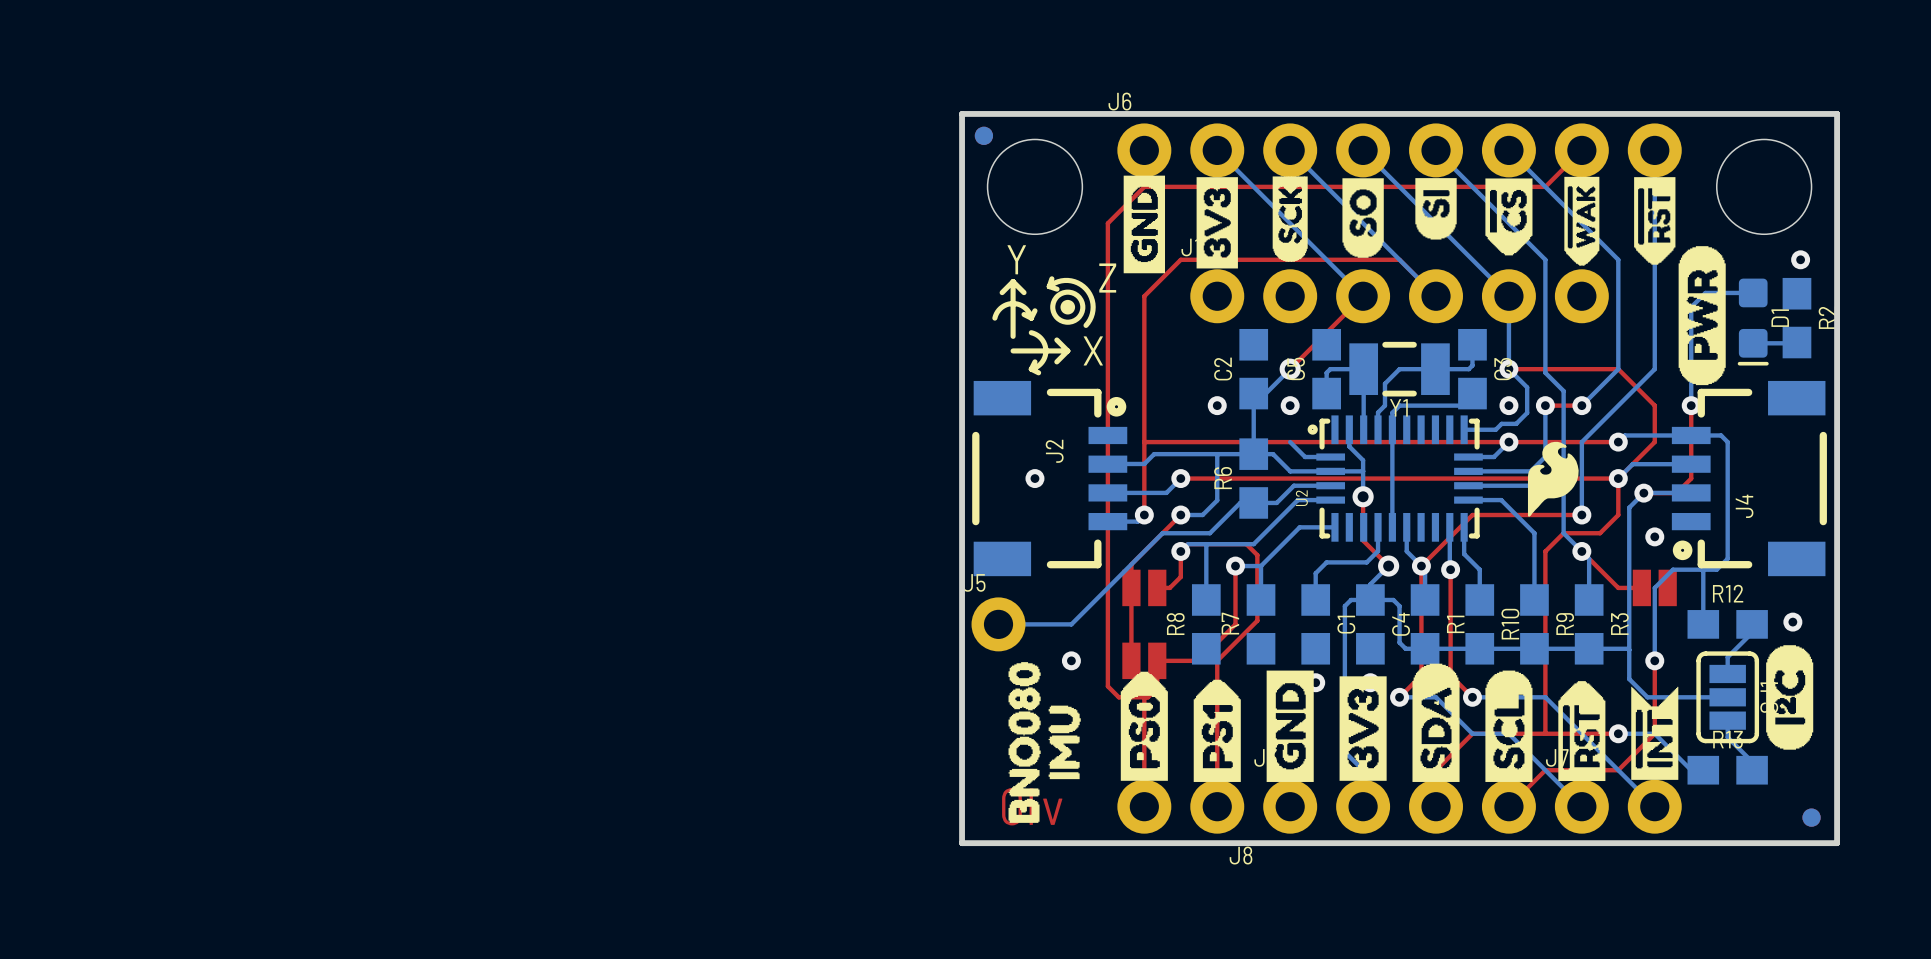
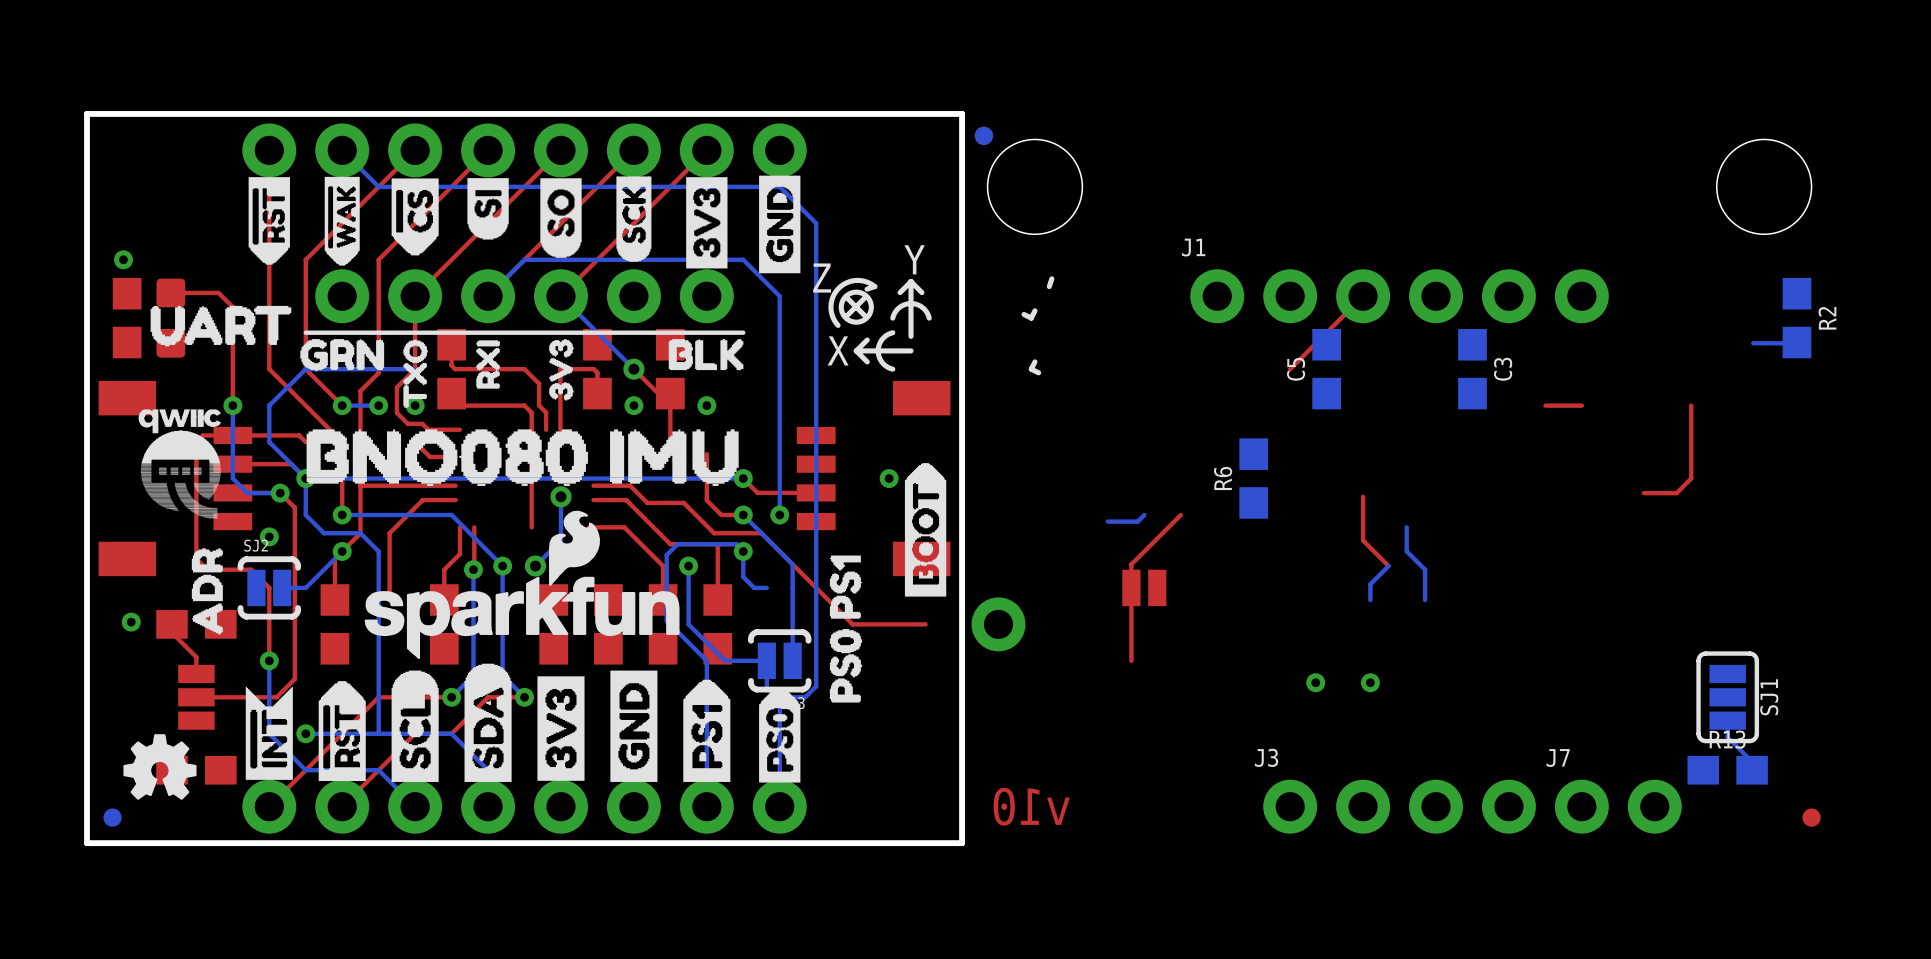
board edge: (962, 113) (1837, 113) (1837, 843) (962, 843) -> (962, 113) (87, 113) (87, 843) (962, 843)
top track: none -> (269, 150) (269, 369) (342, 442) (342, 515)
bottom track: none -> (342, 150) (378, 186) (779, 186) (816, 223) (816, 686) (805, 697) (776, 697) (766, 688) (766, 660) (725, 660) (688, 624) (688, 566)
top track: none -> (415, 150) (305, 259) (305, 369) (342, 405)
top track: none -> (488, 150) (378, 259) (378, 372) (360, 391) (360, 533) (334, 558) (334, 599)
part: none -> (524, 150)
top track: none -> (560, 150) (415, 296) (415, 369) (396, 387) (396, 412) (407, 423) (422, 423) (428, 429) (459, 429)
top track: none -> (633, 150) (488, 296)
top track: none -> (706, 150) (560, 296)
bottom track: (1217, 150) (1363, 296) -> none
bottom track: (1290, 150) (1436, 296) -> none
bottom track: (1363, 150) (1508, 296) (1508, 369) (1527, 387) (1527, 412) (1516, 423) (1501, 423) (1495, 429) (1464, 429) -> none
J6: (1399, 150) -> none
bottom track: (1436, 150) (1545, 259) (1545, 372) (1563, 391) (1563, 533) (1589, 558) (1589, 599) -> none
bottom track: (1508, 150) (1618, 259) (1618, 369) (1581, 405) -> none
top track: (1581, 150) (1545, 186) (1144, 186) (1107, 223) (1107, 686) (1118, 697) (1147, 697) (1157, 688) (1157, 660) (1199, 660) (1235, 624) (1235, 566) -> none
bottom track: (1654, 150) (1654, 369) (1581, 442) (1581, 515) -> none
drawing: none -> [324, 176, 582, 266]
drawing: [1342, 176, 1600, 266] -> none
drawing: none -> [248, 177, 290, 265]
drawing: [1634, 177, 1726, 386] -> none
drawing position: (1290, 219) -> (633, 219)
drawing position: (1217, 222) -> (706, 222)
drawing position: (1144, 224) -> (779, 224)
via: none -> (123, 259)
text position: Y (1016, 259) -> Y (914, 259)
via: (1800, 259) -> none
text position: Z (1107, 278) -> Z (822, 278)
line: (1013, 281) (1013, 336) -> (911, 281) (911, 336)
line: (1013, 281) (1002, 292) -> (911, 281) (900, 292)
line: (1013, 281) (1024, 292) -> (911, 281) (921, 292)
line: none -> (867, 289) (874, 286) (866, 281) (856, 280) (846, 282) (836, 291) (831, 300) (831, 310) (838, 325)
line: (1057, 289) (1049, 286) (1058, 281) (1068, 280) (1077, 282) (1088, 291) (1092, 300) (1092, 310) (1086, 325) -> none
top track: none -> (170, 292) (218, 292) (232, 307) (232, 405)
bottom track: (1753, 292) (1705, 292) (1691, 307) (1691, 405) -> none
bottom track: none -> (488, 296) (524, 259) (743, 259) (779, 296) (779, 515)
part: none -> (524, 296)
bottom track: none -> (560, 296) (633, 369)
top track: (1436, 296) (1399, 259) (1180, 259) (1144, 296) (1144, 515) -> none
line: none -> (846, 297) (865, 315)
line: none -> (865, 297) (846, 315)
drawing: [1060, 299, 1076, 315] -> none
drawing: none -> [150, 305, 739, 782]
drawing position: (1067, 307) -> (856, 307)
part: none -> (127, 318)
part: none -> (170, 318)
line: (1031, 318) (1025, 308) (1013, 303) (1000, 308) (994, 318) -> (929, 318) (923, 308) (911, 303) (898, 308) (892, 318)
D1: (1753, 322) -> none
line: none -> (743, 332) (305, 332)
line: none -> (892, 332) (883, 338) (878, 350) (883, 363) (892, 369)
line: (1031, 332) (1041, 338) (1045, 350) (1041, 363) (1031, 369) -> none
drawing: none -> [668, 339, 744, 371]
drawing: none -> [476, 340, 500, 389]
line: (1056, 340) (1067, 350) -> (856, 350) (867, 361)
top track: none -> (451, 344) (451, 365) (455, 369) (524, 369) (539, 383) (539, 405) (546, 412) (546, 429)
bottom track: (1472, 344) (1472, 365) (1468, 369) (1399, 369) (1384, 383) (1384, 405) (1378, 412) (1378, 429) -> none
line: (1067, 350) (1013, 350) -> (911, 350) (856, 350)
line: (1067, 350) (1056, 361) -> (867, 340) (856, 350)
text position: X (1093, 350) -> X (838, 350)
bottom track: none -> (415, 369) (305, 369) (269, 405) (269, 442) (305, 478)
part: none -> (451, 369)
part: none -> (597, 369)
top track: none -> (633, 369) (658, 393) (670, 393) (670, 454)
via: none -> (633, 369)
C2 side: bottom (1253, 369) -> top (670, 369)
bottom track: (1290, 369) (1265, 393) (1253, 393) (1253, 454) -> none
via: (1290, 369) -> none
Y1: (1399, 369) -> none
top track: (1508, 369) (1618, 369) (1654, 405) (1654, 442) (1618, 478) -> none
via: (1508, 369) -> none
top track: none -> (451, 393) (463, 405) (524, 405) (531, 412) (531, 527)
top track: none -> (597, 393) (597, 372) (593, 369) (560, 369) (560, 429)
bottom track: (1326, 393) (1326, 372) (1330, 369) (1363, 369) (1363, 429) -> none
bottom track: (1472, 393) (1460, 405) (1399, 405) (1392, 412) (1392, 527) -> none
bottom track: none -> (232, 405) (232, 478) (247, 493) (280, 493)
via: none -> (232, 405)
via: none -> (342, 405)
bottom track: none -> (378, 405) (342, 405)
via: none -> (378, 405)
via: none -> (415, 405)
via: none -> (633, 405)
via: none -> (706, 405)
via: (1217, 405) -> none
via: (1290, 405) -> none
via: (1508, 405) -> none
bottom track: (1545, 405) (1545, 456) (1530, 471) (1468, 471) -> none
via: (1545, 405) -> none
via: (1581, 405) -> none
via: (1691, 405) -> none
drawing: none -> [138, 409, 223, 635]
bottom track: (1349, 429) (1349, 446) (1363, 460) (1363, 496) -> none
drawing: [1527, 441, 1579, 517] -> none
top track: none -> (305, 442) (299, 435) (202, 435) (196, 442) (196, 558) (207, 569) (251, 569) (269, 587) (269, 660)
top track: none -> (415, 442) (430, 457) (455, 457)
bottom track: (1290, 442) (1305, 457) (1330, 457) -> none
bottom track: (1508, 442) (1494, 457) (1468, 457) -> none
via: (1508, 442) -> none
bottom track: (1618, 442) (1624, 435) (1721, 435) (1727, 442) (1727, 558) (1716, 569) (1673, 569) (1654, 587) (1654, 660) -> none
top track: (1618, 442) (1144, 442) -> none
via: (1618, 442) -> none
top track: none -> (706, 454) (706, 500) (721, 515) (743, 515)
bottom track: (1217, 454) (1217, 500) (1202, 515) (1180, 515) -> none
drawing: none -> [904, 463, 947, 597]
bottom track: (1108, 463) (1144, 463) (1154, 454) (1273, 454) (1290, 471) (1362, 471) -> none
top track: none -> (232, 464) (291, 464) (305, 478)
bottom track: (1691, 464) (1632, 464) (1618, 478) -> none
part: none -> (175, 478)
bottom track: none -> (305, 478) (305, 515) (324, 533) (360, 533) (378, 551) (378, 733)
via: none -> (305, 478)
bottom track: none -> (743, 478) (305, 478)
top track: none -> (743, 478) (757, 492) (816, 492)
via: none -> (743, 478)
via: none -> (889, 478)
via: (1034, 478) -> none
J2 side: bottom (1049, 478) -> top (873, 478)
bottom track: (1180, 478) (1166, 492) (1107, 492) -> none
via: (1180, 478) -> none
U2: (1395, 478) -> none
top track: (1618, 478) (1180, 478) -> none
top track: (1618, 478) (1618, 515) (1600, 533) (1563, 533) (1545, 551) (1545, 733) -> none
via: (1618, 478) -> none
J4: (1749, 478) -> none
top track: none -> (455, 485) (360, 485)
top track: none -> (593, 485) (630, 485) (647, 502) (683, 502) (714, 533) (761, 533) (852, 624) (925, 624)
bottom track: (1330, 485) (1293, 485) (1276, 502) (1240, 502) (1209, 533) (1162, 533) (1071, 624) (998, 624) -> none
bottom track: (1563, 485) (1468, 485) -> none
top track: none -> (232, 492) (280, 492) (294, 507) (294, 679) (276, 697) (196, 697)
bottom track: (1691, 492) (1644, 492) (1629, 507) (1629, 679) (1647, 697) (1727, 697) -> none
via: none -> (280, 493)
via: (1643, 493) -> none
bottom track: none -> (560, 496) (560, 540) (535, 566)
via: none -> (560, 496)
via: (1363, 496) -> none
top track: none -> (455, 500) (422, 500) (389, 533) (389, 599)
top track: none -> (593, 500) (626, 500) (670, 544) (735, 544) (743, 551)
bottom track: (1330, 500) (1297, 500) (1253, 544) (1188, 544) (1180, 551) -> none
bottom track: (1468, 500) (1501, 500) (1534, 533) (1534, 599) -> none
bottom track: none -> (342, 515) (451, 515) (502, 566) (502, 675) (524, 697)
via: none -> (342, 515)
bottom track: none -> (743, 515) (792, 564) (792, 660)
via: none -> (743, 515)
via: none -> (779, 515)
via: (1144, 515) -> none
via: (1180, 515) -> none
top track: (1581, 515) (1472, 515) (1421, 566) (1421, 675) (1399, 697) -> none
via: (1581, 515) -> none
top track: none -> (459, 527) (459, 554) (444, 569) (444, 599)
top track: none -> (474, 527) (473, 569)
top track: none -> (589, 527) (624, 527) (663, 566) (663, 599)
bottom track: (1334, 527) (1299, 527) (1261, 566) -> none
bottom track: (1378, 527) (1378, 551) (1366, 562) (1326, 562) (1315, 573) (1315, 599) -> none
bottom track: (1449, 527) (1450, 569) -> none
bottom track: (1464, 527) (1464, 554) (1479, 569) (1479, 599) -> none
via: none -> (269, 536)
via: (1654, 536) -> none
top track: none -> (717, 544) (717, 599)
bottom track: (1206, 544) (1206, 599) -> none
bottom track: none -> (342, 551) (305, 587) (282, 587)
via: none -> (342, 551)
via: none -> (743, 551)
via: (1180, 551) -> none
top track: (1581, 551) (1618, 587) (1641, 587) -> none
via: (1581, 551) -> none
drawing: none -> [759, 555, 863, 783]
via: none -> (502, 566)
via: none -> (535, 566)
via: none -> (688, 566)
via: (1235, 566) -> none
bottom track: (1261, 566) (1261, 599) -> none
bottom track: (1261, 566) (1235, 566) -> none
via: (1388, 566) -> none
via: (1421, 566) -> none
bottom track: none -> (473, 569) (473, 675) (451, 697)
via: none -> (473, 569)
top track: (1450, 569) (1450, 675) (1472, 697) -> none
via: (1450, 569) -> none
bottom track: (1702, 569) (1703, 624) -> none
SJ2: none -> (269, 587)
bottom track: none -> (766, 587) (754, 587) (743, 576) (743, 551) (735, 544) (677, 544) (666, 555) (666, 620) (706, 660) (706, 806)
top track: (1157, 587) (1169, 587) (1180, 576) (1180, 551) (1188, 544) (1246, 544) (1257, 555) (1257, 620) (1217, 660) (1217, 806) -> none
part: (1654, 587) -> none
via: none -> (131, 622)
via: (1792, 622) -> none
top track: none -> (171, 624) (171, 632) (196, 657) (196, 673)
part: none -> (196, 624)
part: none -> (334, 624)
part: none -> (444, 624)
part: none -> (553, 624)
R8 side: bottom (1206, 624) -> top (717, 624)
R7 side: bottom (1261, 624) -> top (663, 624)
C1 side: bottom (1315, 624) -> top (608, 624)
C4: (1370, 624) -> none
R1: (1425, 624) -> none
R10: (1479, 624) -> none
R9: (1534, 624) -> none
R3: (1589, 624) -> none
R12: (1727, 624) -> none
bottom track: (1752, 624) (1752, 632) (1727, 657) (1727, 673) -> none
drawing: [1766, 645, 1814, 750] -> none
bottom track: (1629, 649) (1405, 648) (1399, 642) (1399, 606) (1393, 599) (1351, 599) (1344, 606) (1344, 751) (1363, 770) (1363, 806) -> none
bottom track: none -> (269, 660) (269, 733) (305, 770) (378, 770) (415, 806)
via: none -> (269, 660)
via: (1071, 660) -> none
part side: top (1144, 660) -> bottom (779, 660)
top track: (1654, 660) (1654, 733) (1618, 770) (1545, 770) (1508, 806) -> none
via: (1654, 660) -> none
drawing: [1008, 662, 1081, 823] -> none
drawing: [1339, 663, 1679, 782] -> none
drawing: [1120, 671, 1168, 781] -> none
part: none -> (196, 697)
top track: none -> (451, 697) (378, 697) (269, 806)
via: none -> (451, 697)
top track: none -> (524, 697) (488, 697) (451, 733) (415, 733) (342, 806)
via: none -> (524, 697)
bottom track: none -> (779, 697) (779, 806)
top track: (1144, 697) (1144, 806) -> none
bottom track: (1399, 697) (1436, 697) (1472, 733) (1508, 733) (1581, 806) -> none
via: (1399, 697) -> none
bottom track: (1472, 697) (1545, 697) (1654, 806) -> none
via: (1472, 697) -> none
drawing position: (1290, 726) -> (633, 726)
drawing position: (1217, 730) -> (706, 730)
bottom track: none -> (305, 733) (451, 733) (488, 770) (488, 806)
via: none -> (305, 733)
bottom track: (1618, 733) (1654, 733) (1691, 770) (1703, 770) -> none
top track: (1618, 733) (1472, 733) (1436, 770) (1436, 806) -> none
via: (1618, 733) -> none
drawing: none -> [123, 734, 197, 800]
part: none -> (196, 770)
part: none -> (305, 806)
part: none -> (524, 806)
J8 position: (1180, 806) -> (743, 806)
part: none -> (112, 817)
part: (1811, 817) -> none

